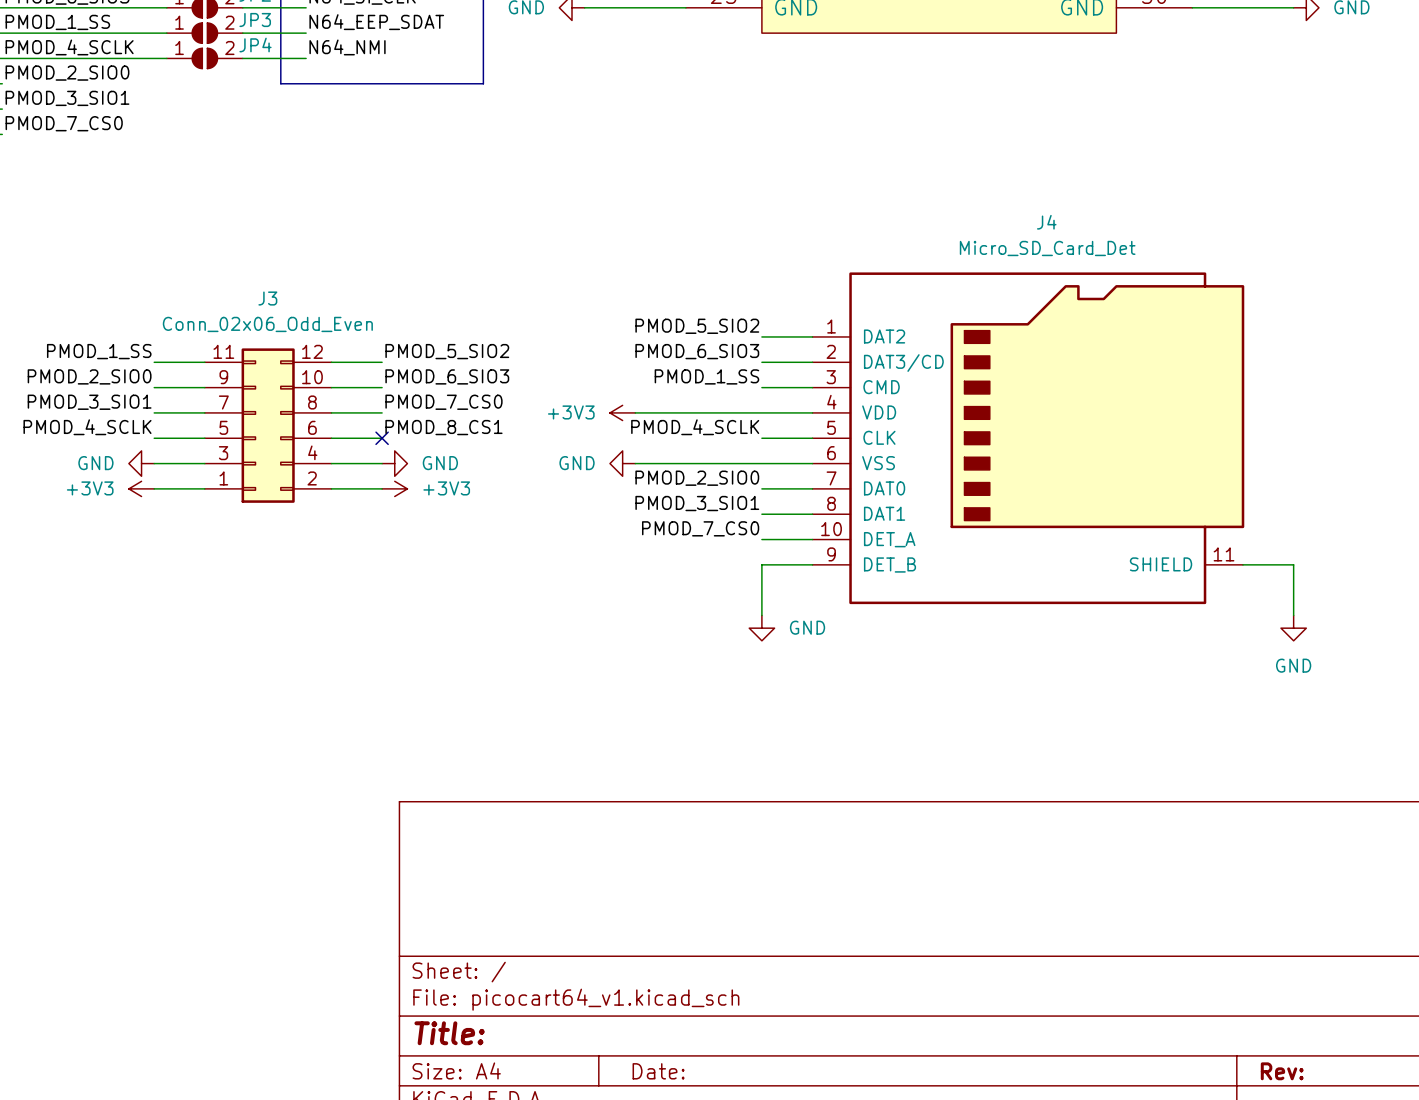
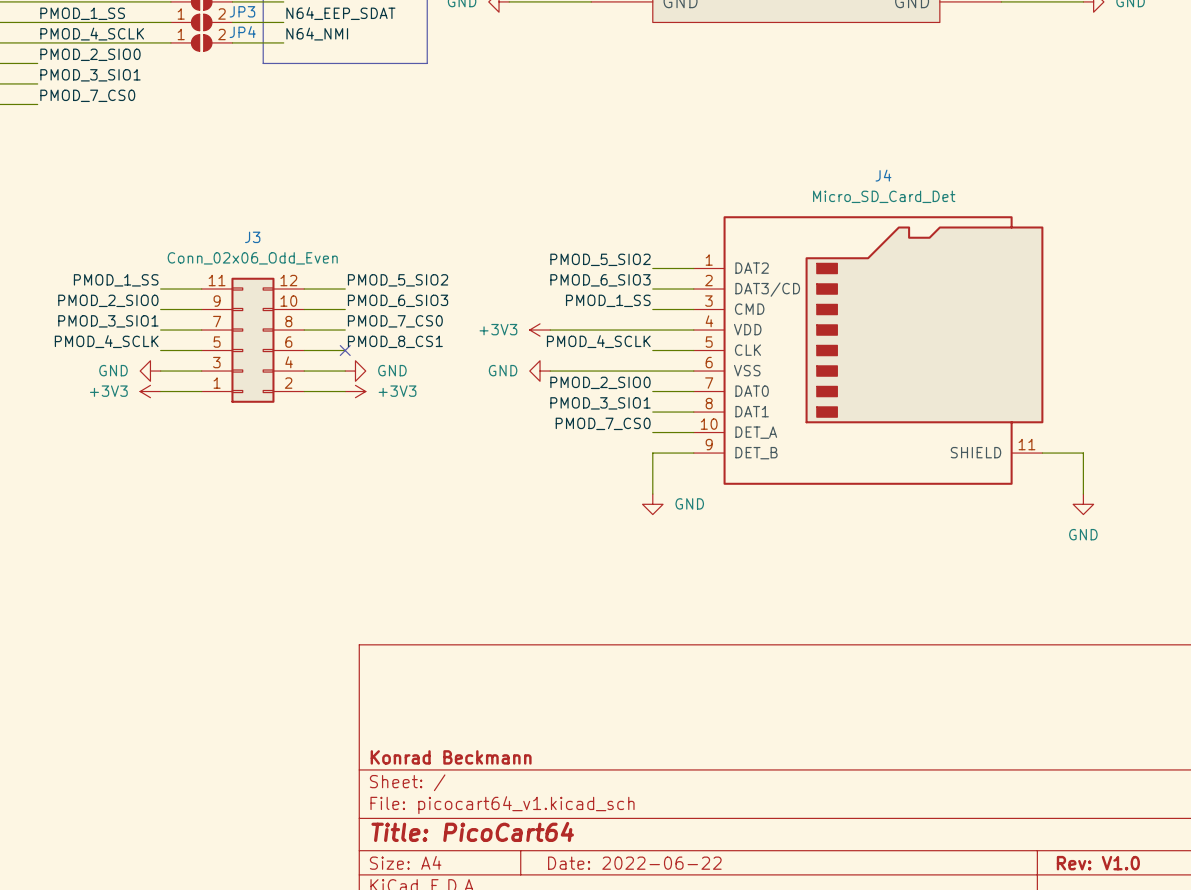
title block: none -> Konrad Beckmann (451, 757)
title block: Title: (449, 1033) -> Title: PicoCart64 (472, 831)
title block: Date: (658, 1071) -> Date: 2022-06-22 (634, 863)
title block: Rev: (1282, 1071) -> Rev: V1.0 (1098, 863)

